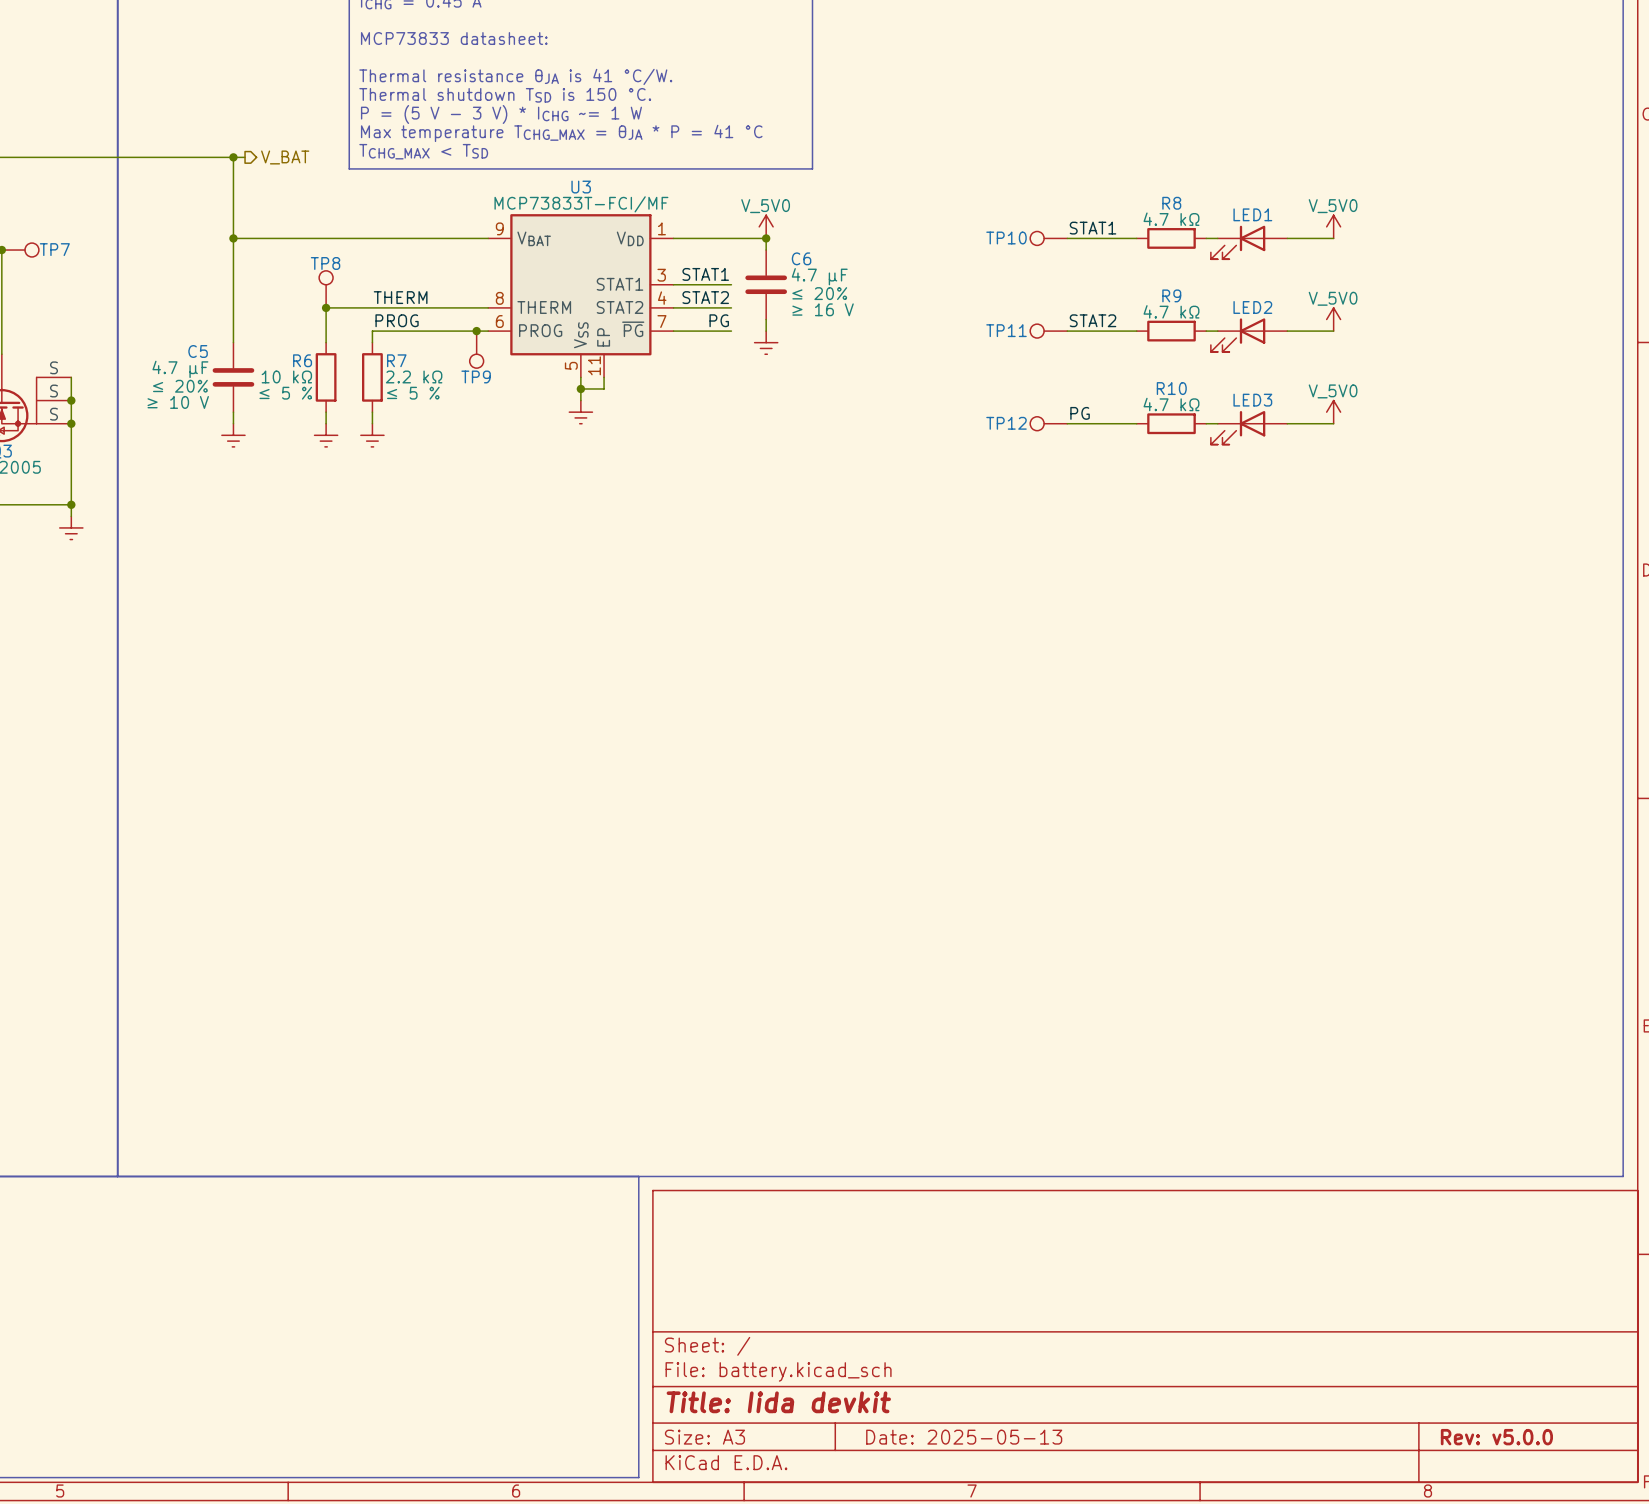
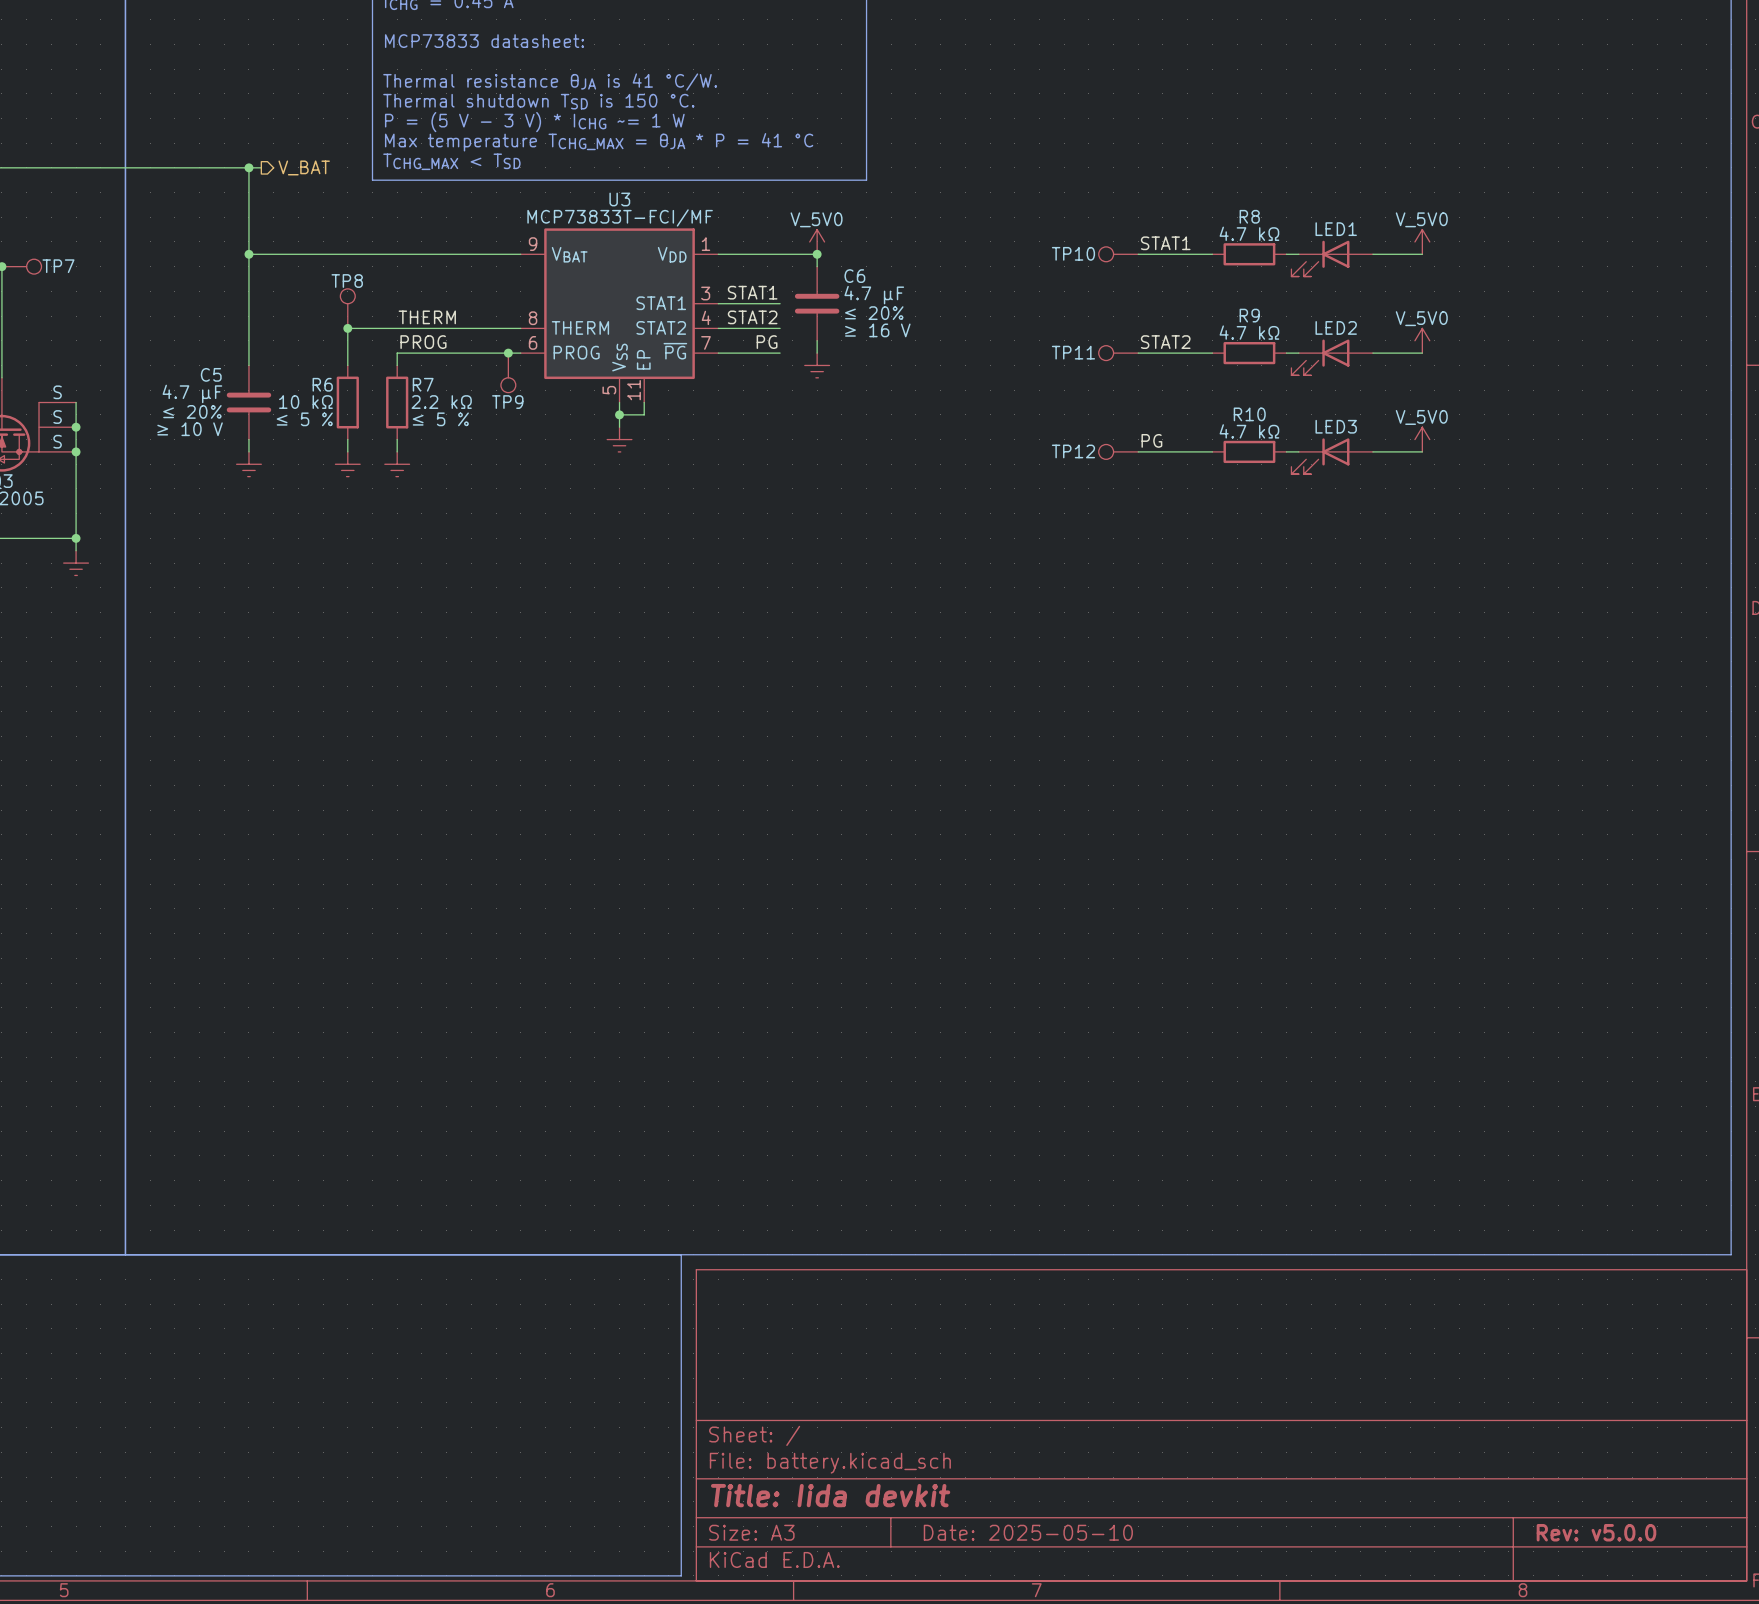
title block: Date: 2025-05-13 (964, 1437) -> Date: 2025-05-10 (1028, 1532)

